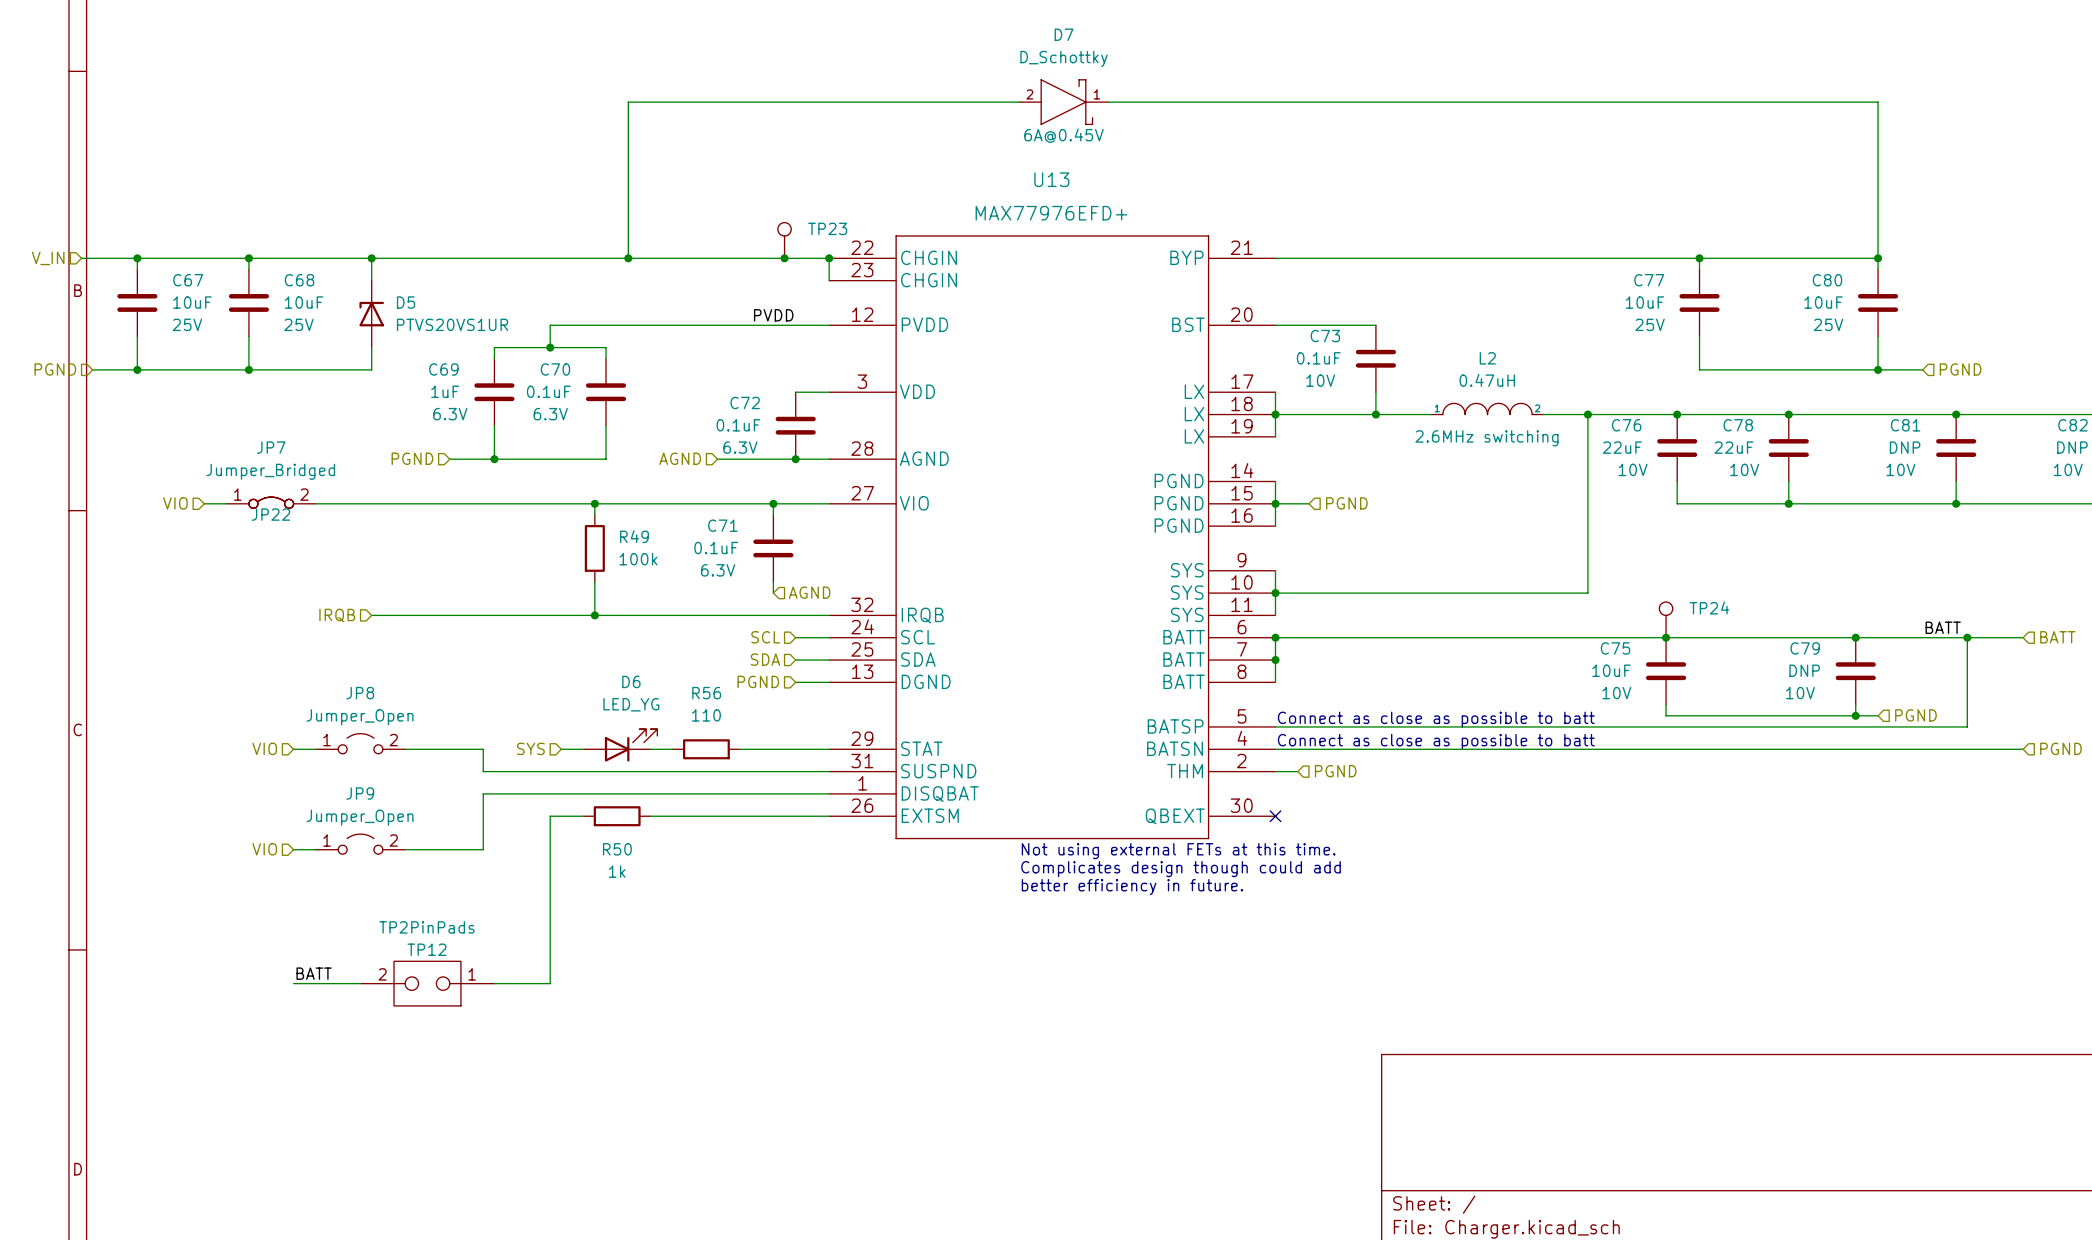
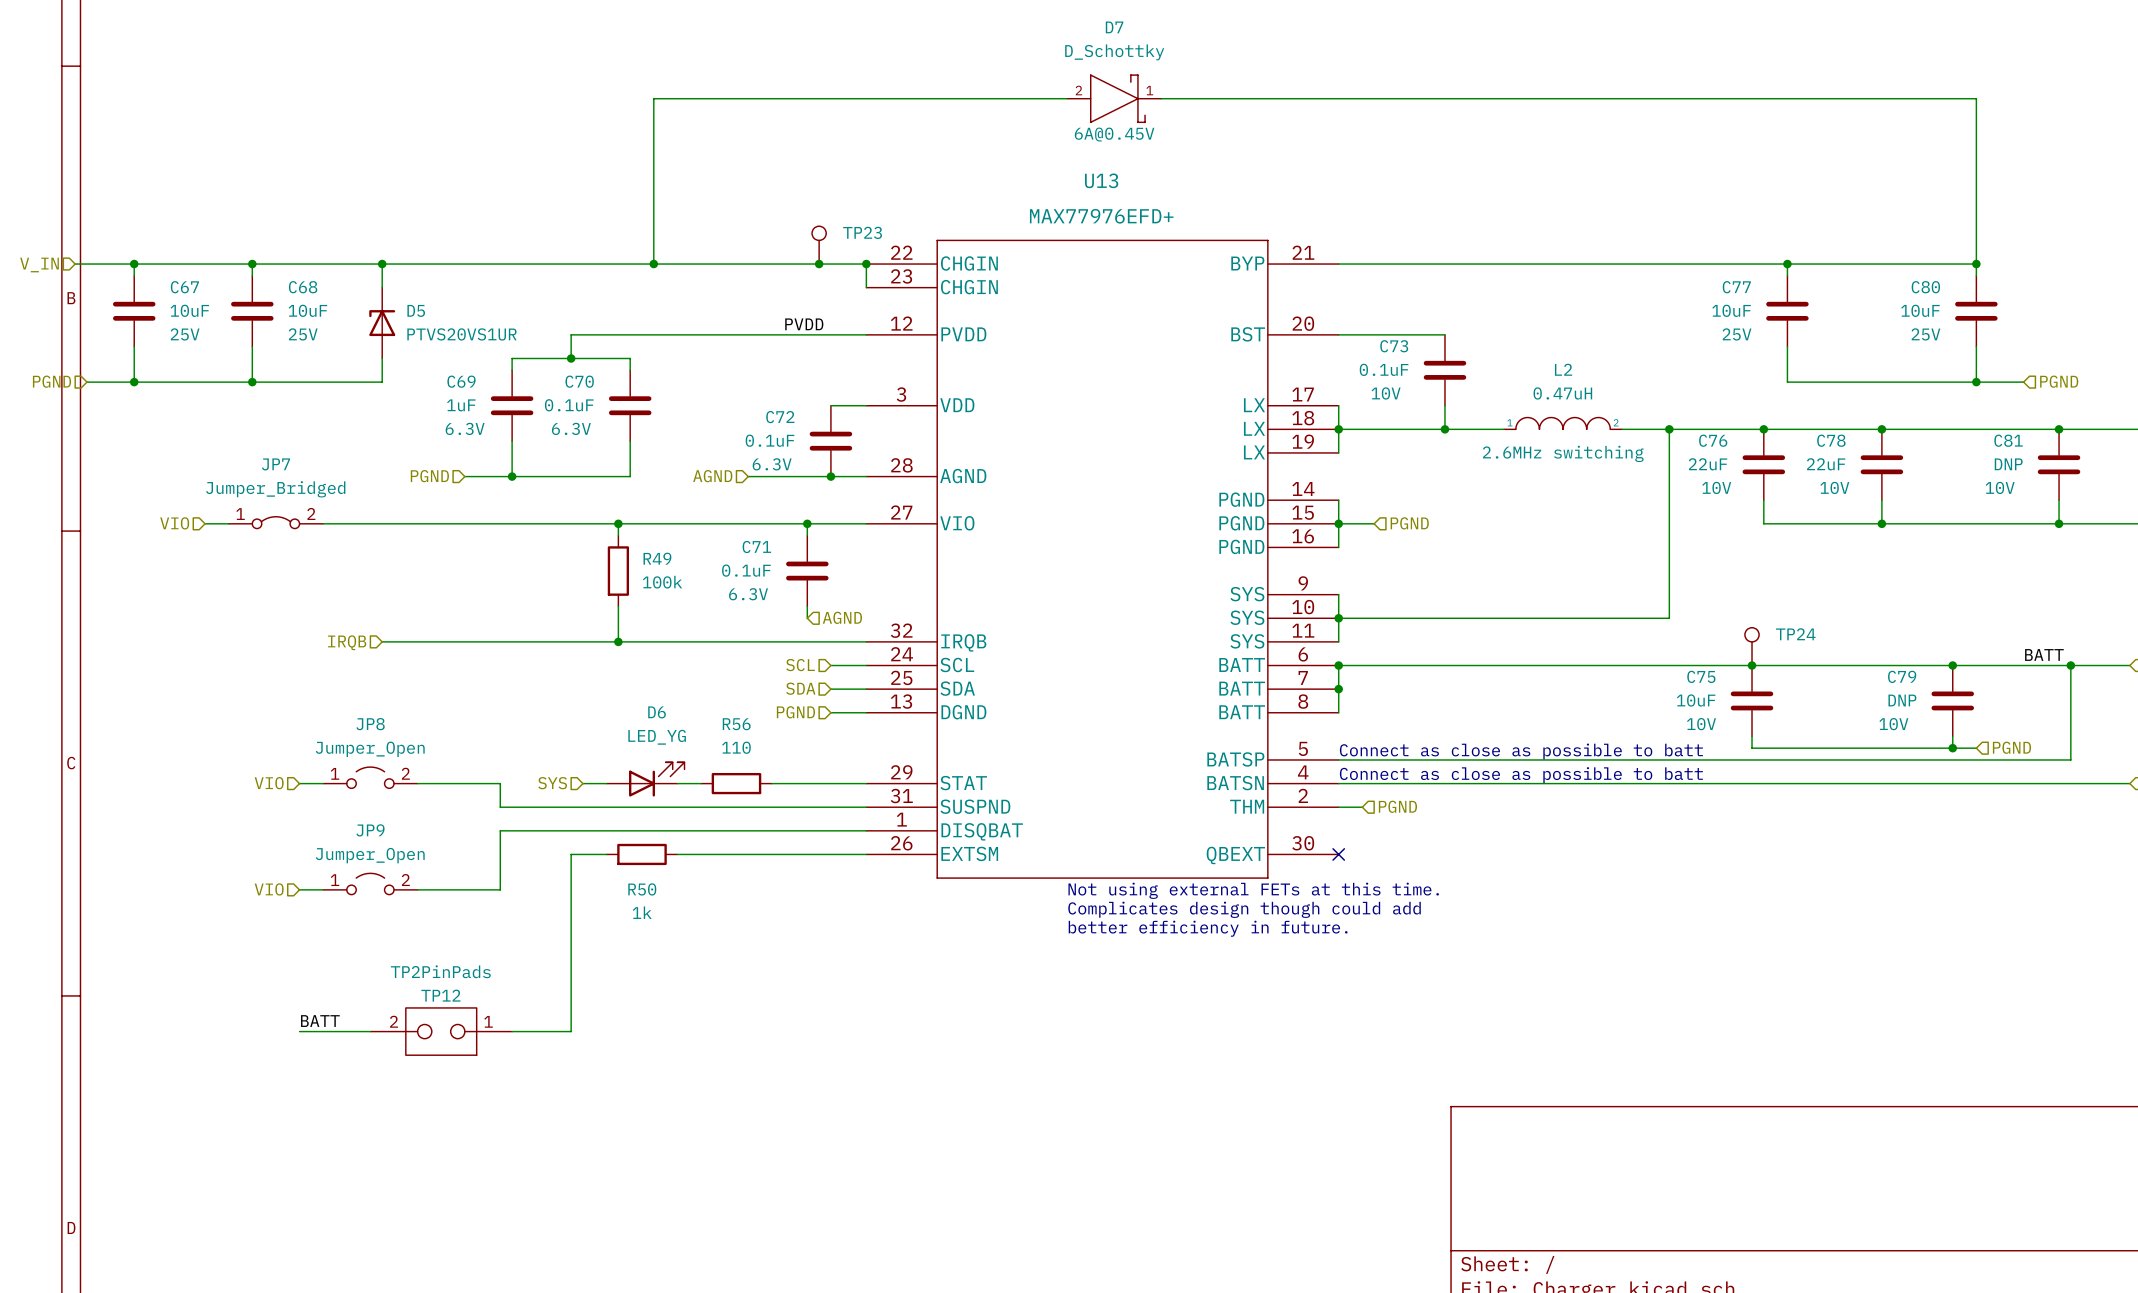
JP22: (271, 502) -> none

